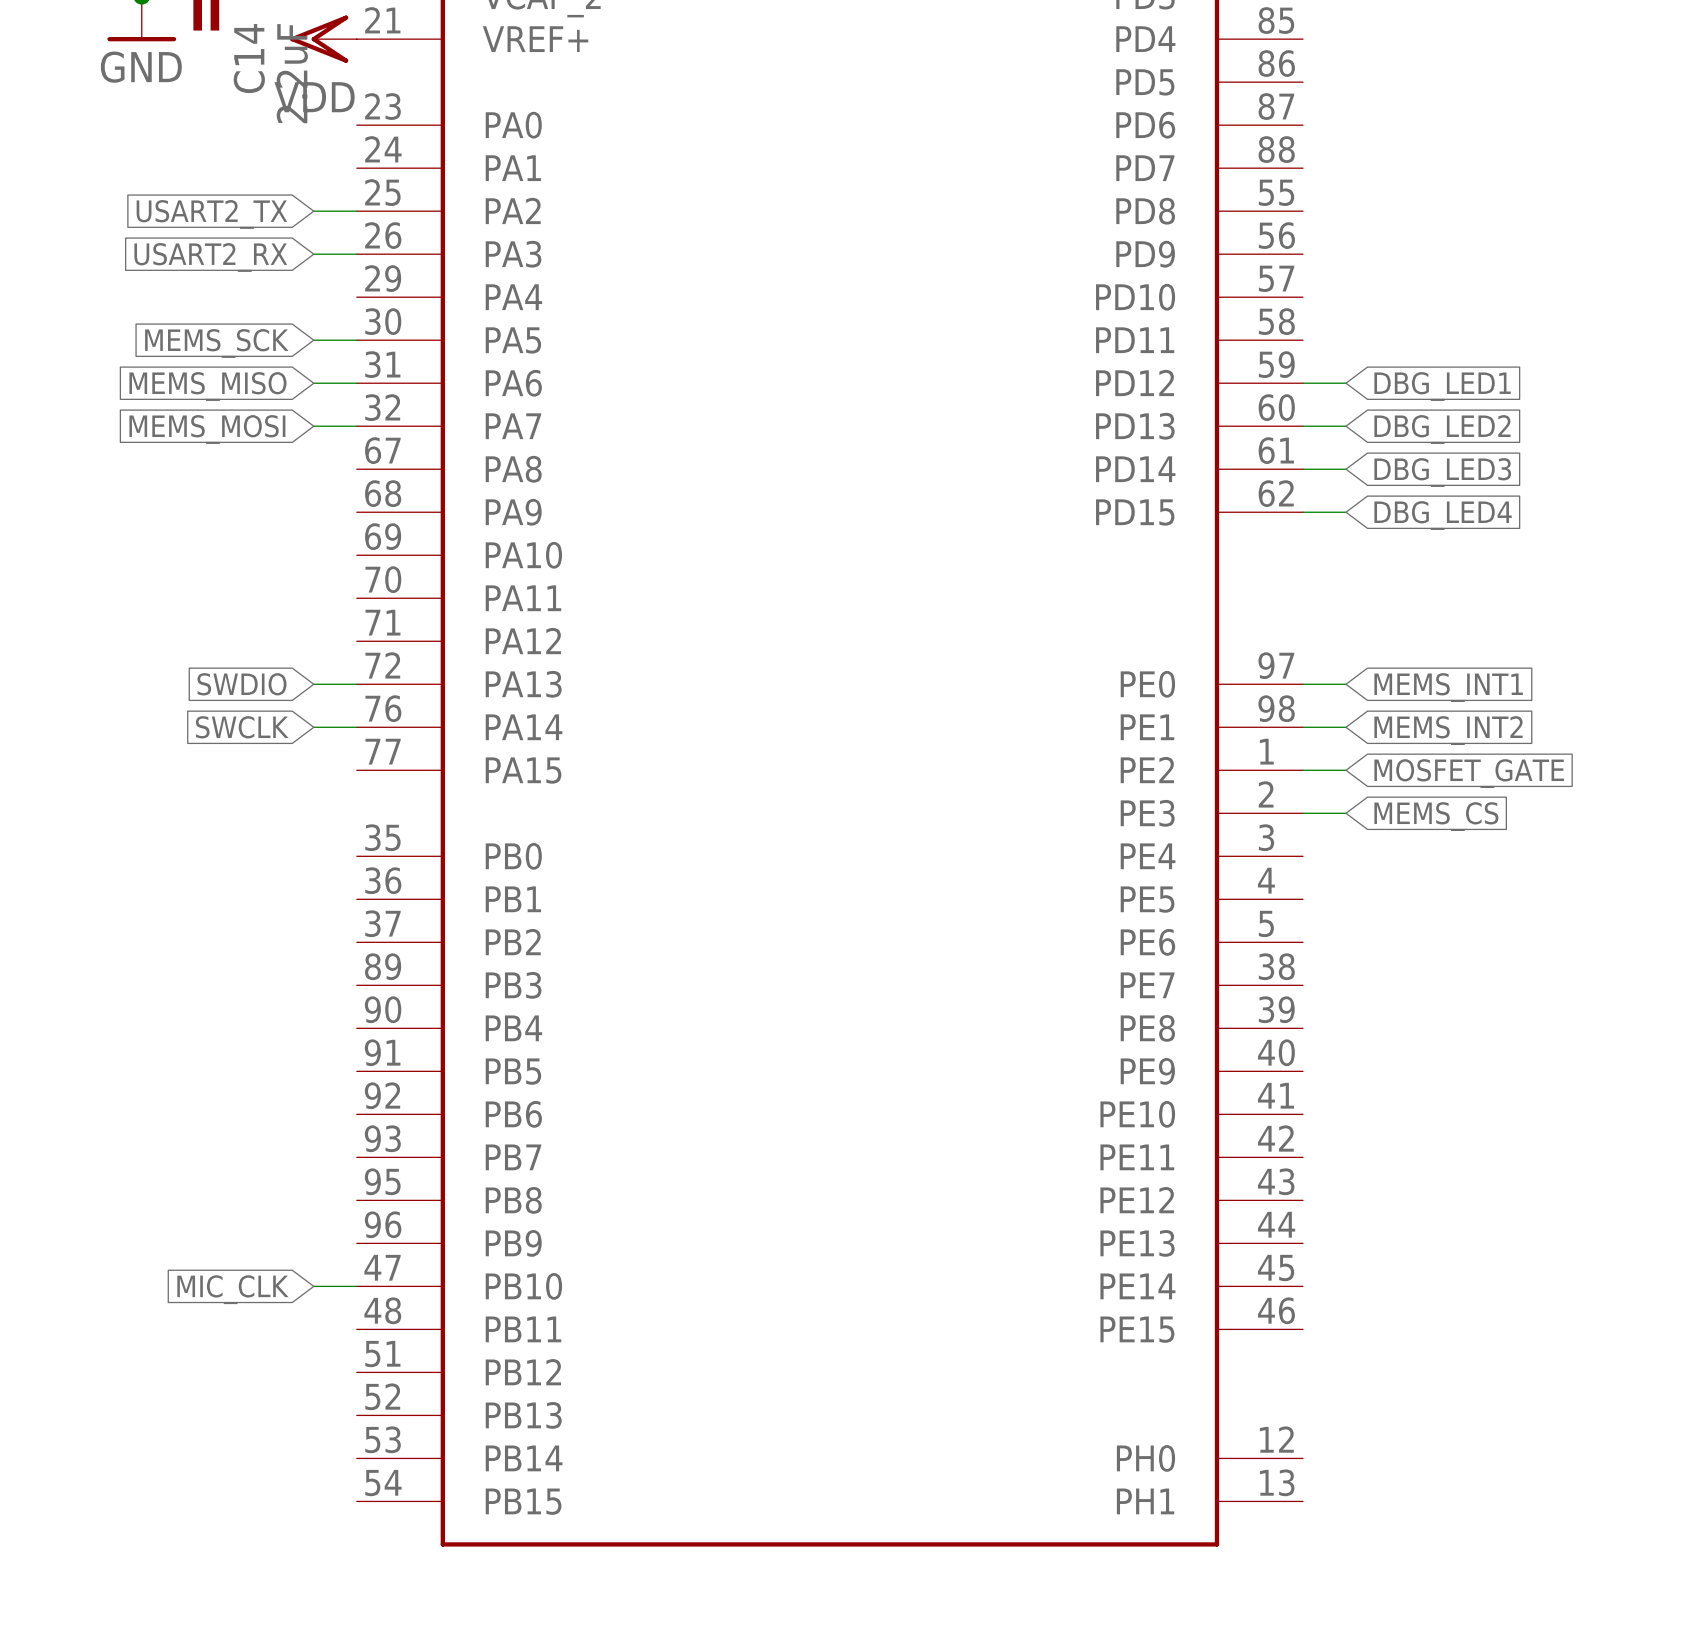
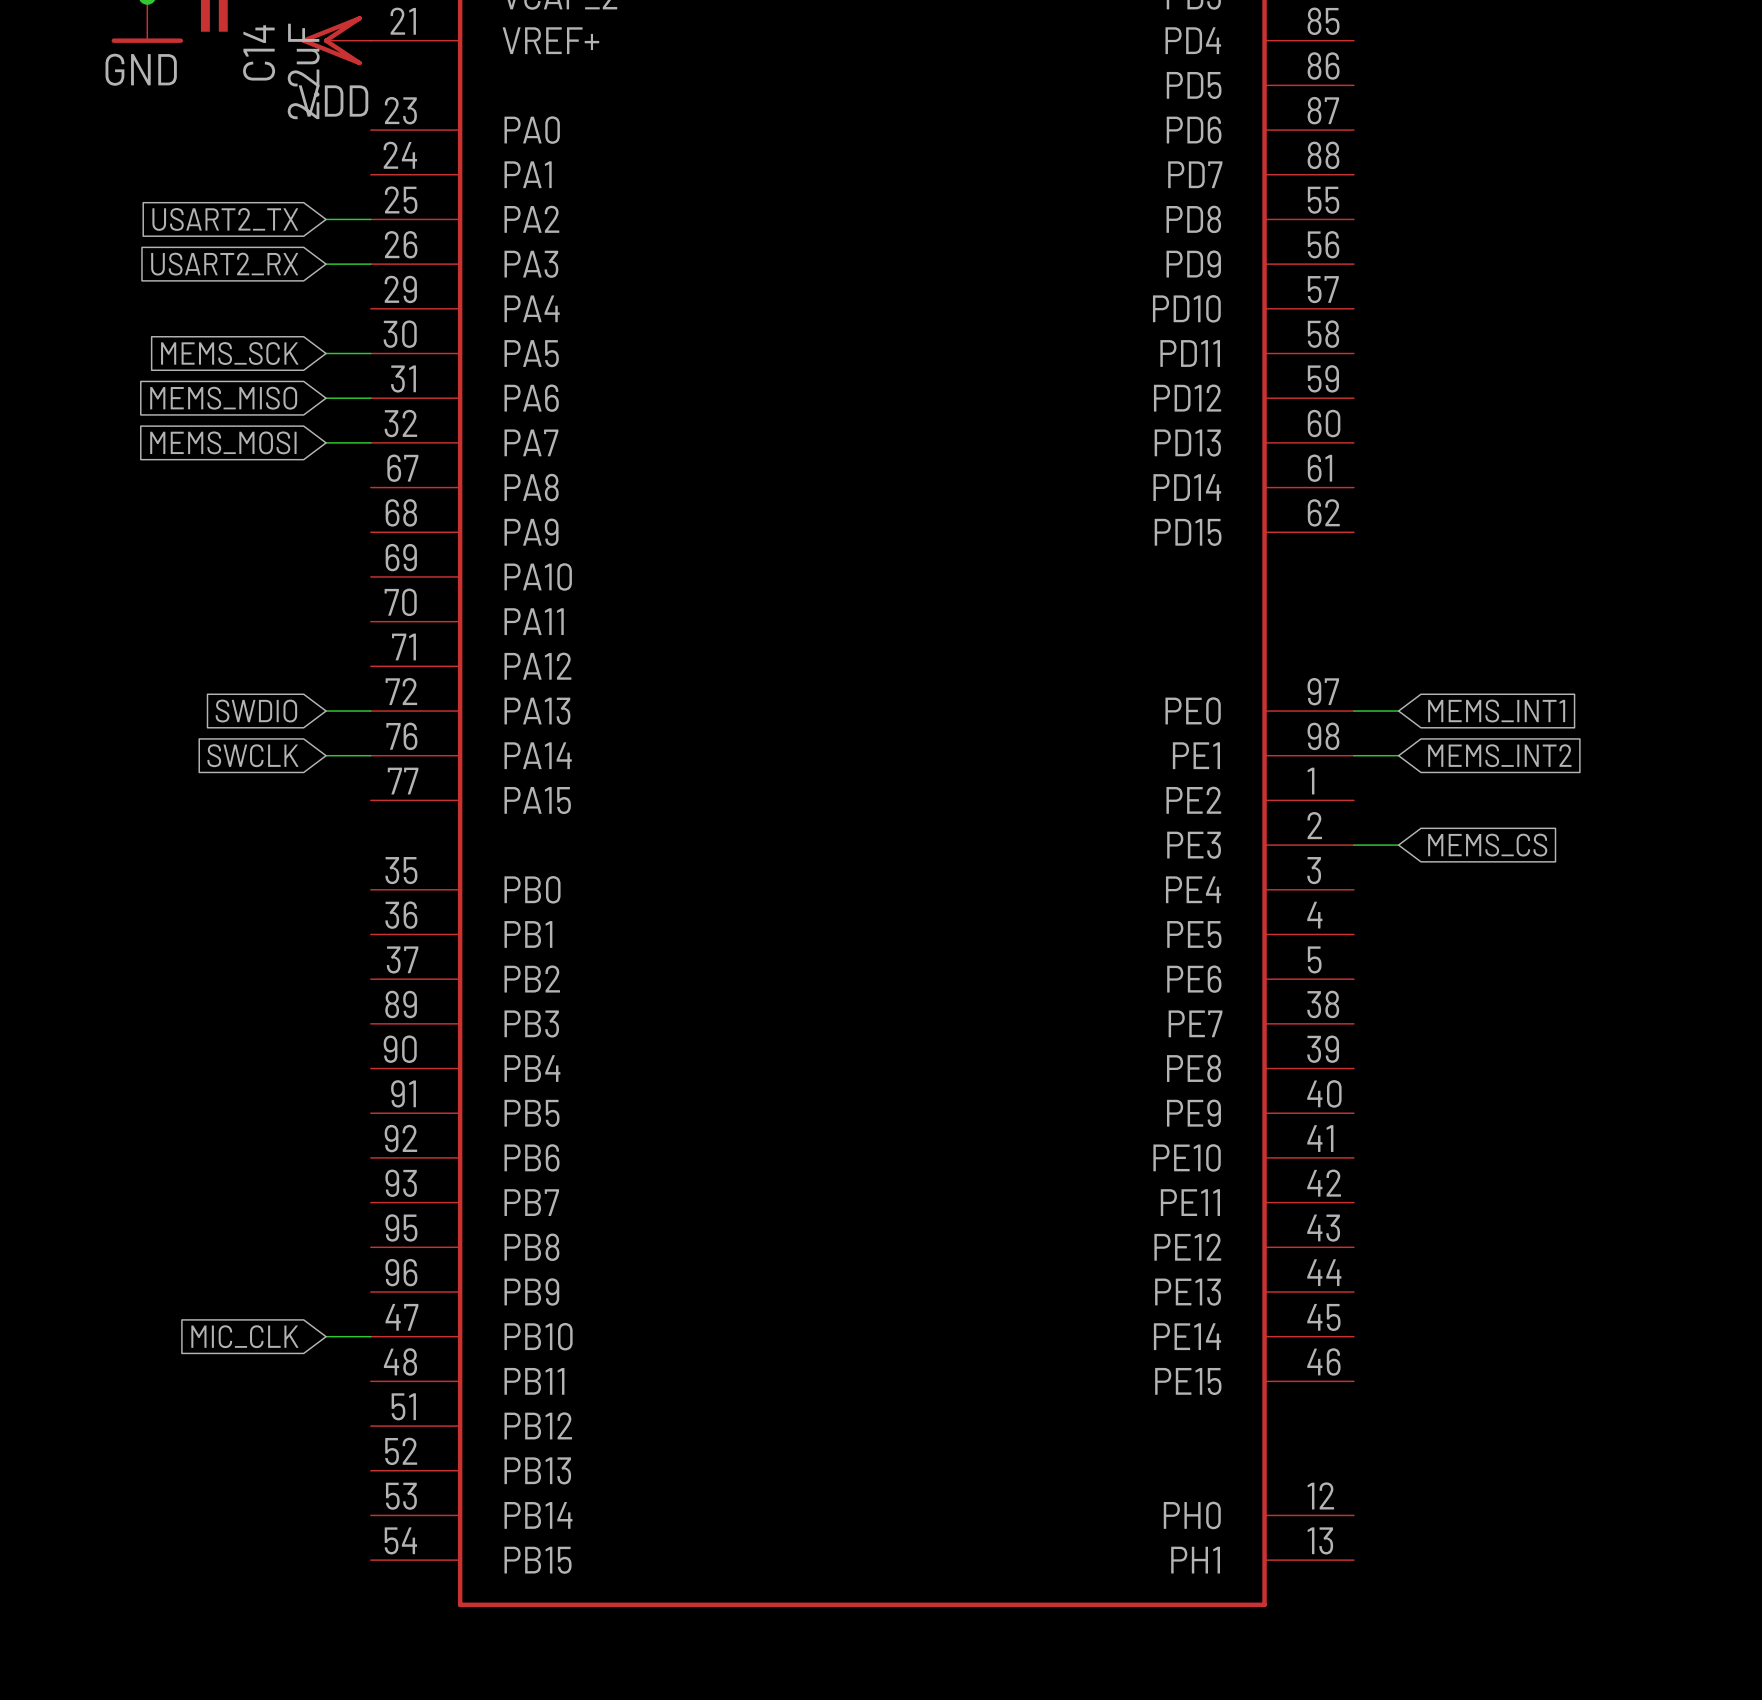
wire: (1302, 383) (1346, 383) -> none
global label: DBG_LED1 (1442, 386) -> none
wire: (1302, 426) (1346, 426) -> none
global label: DBG_LED2 (1442, 429) -> none
wire: (1302, 469) (1346, 469) -> none
global label: DBG_LED3 (1442, 472) -> none
wire: (1302, 512) (1346, 512) -> none
global label: DBG_LED4 (1443, 515) -> none
wire: (1302, 770) (1346, 770) -> none
global label: MOSFET_GATE (1469, 773) -> none

